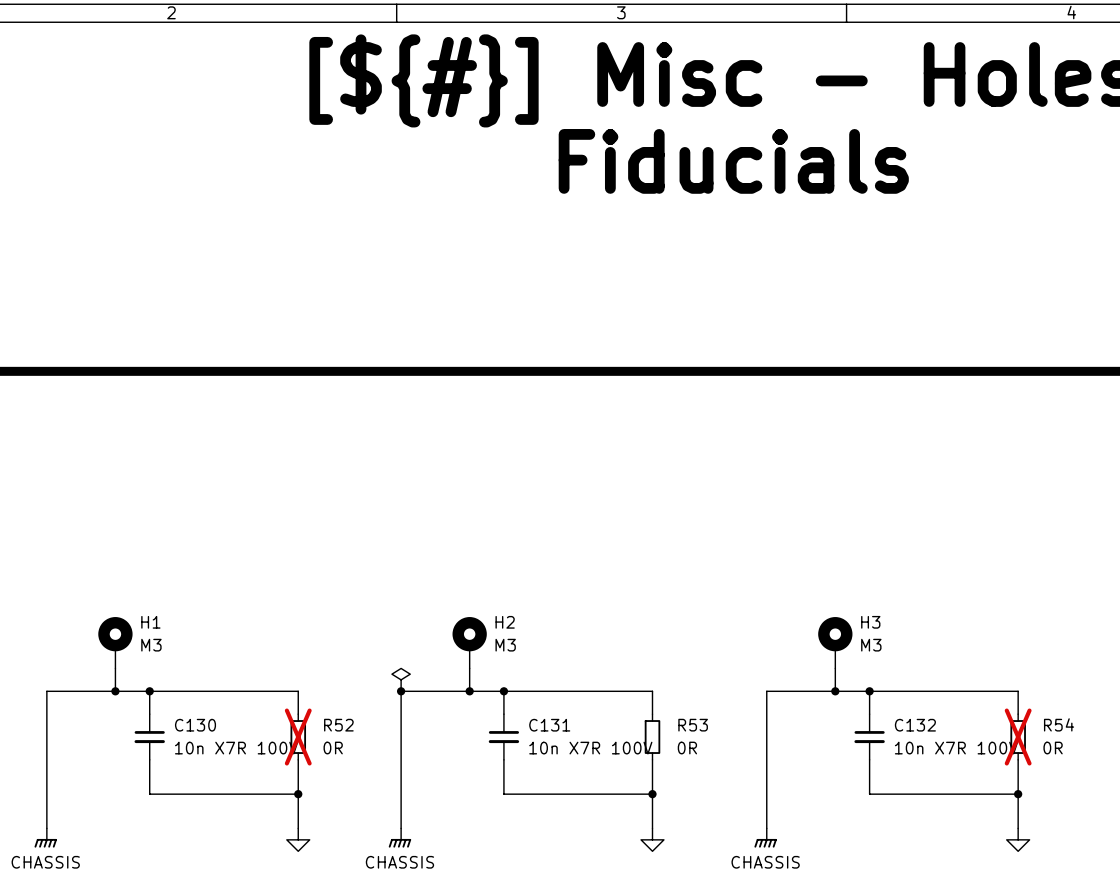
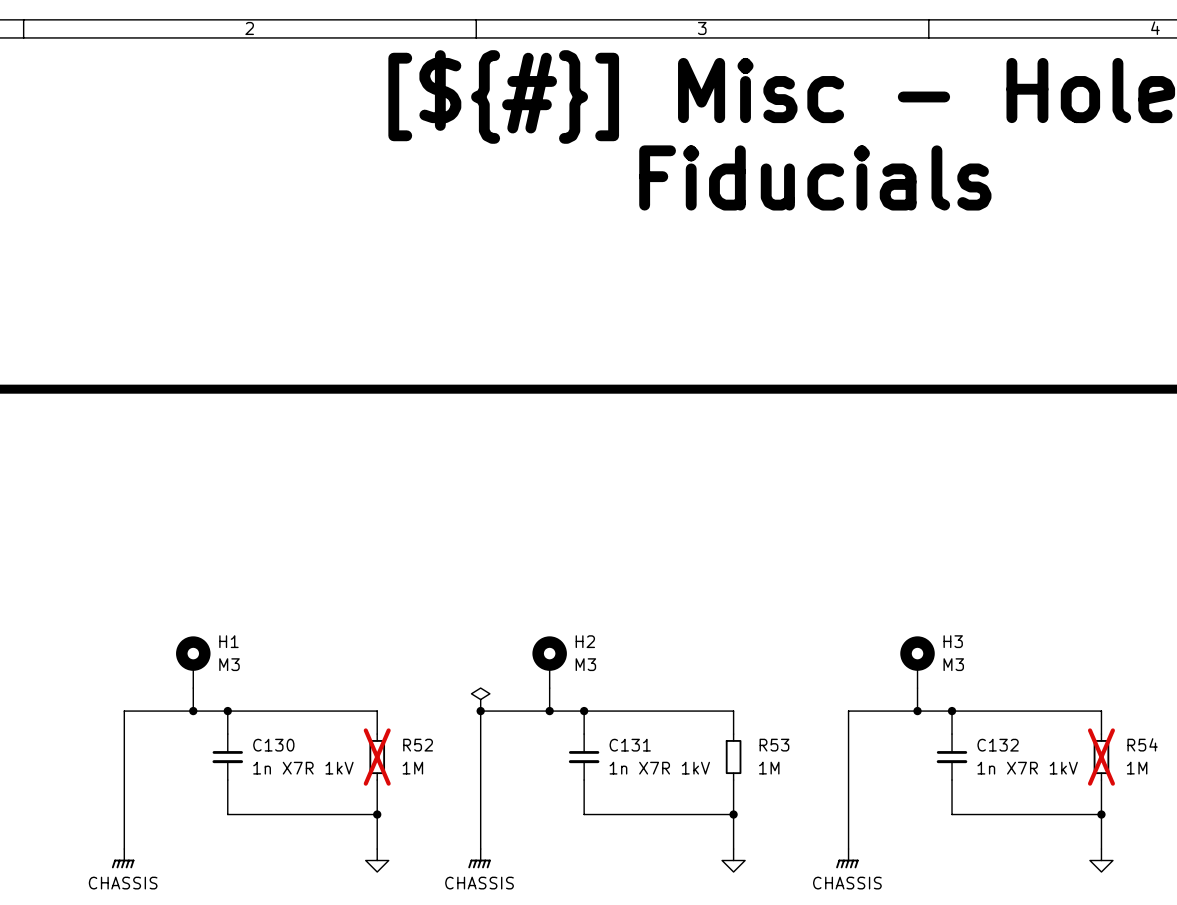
C130 value: 10n X7R 100V (236, 748) -> 1n X7R 1kV (303, 768)
R52 value: 0R (333, 748) -> 1M (412, 768)
C131 value: 10n X7R 100V (590, 748) -> 1n X7R 1kV (659, 768)
R53 value: 0R (687, 748) -> 1M (769, 768)
C132 value: 10n X7R 100V (956, 748) -> 1n X7R 1kV (1027, 768)
R54 value: 0R (1053, 748) -> 1M (1137, 768)

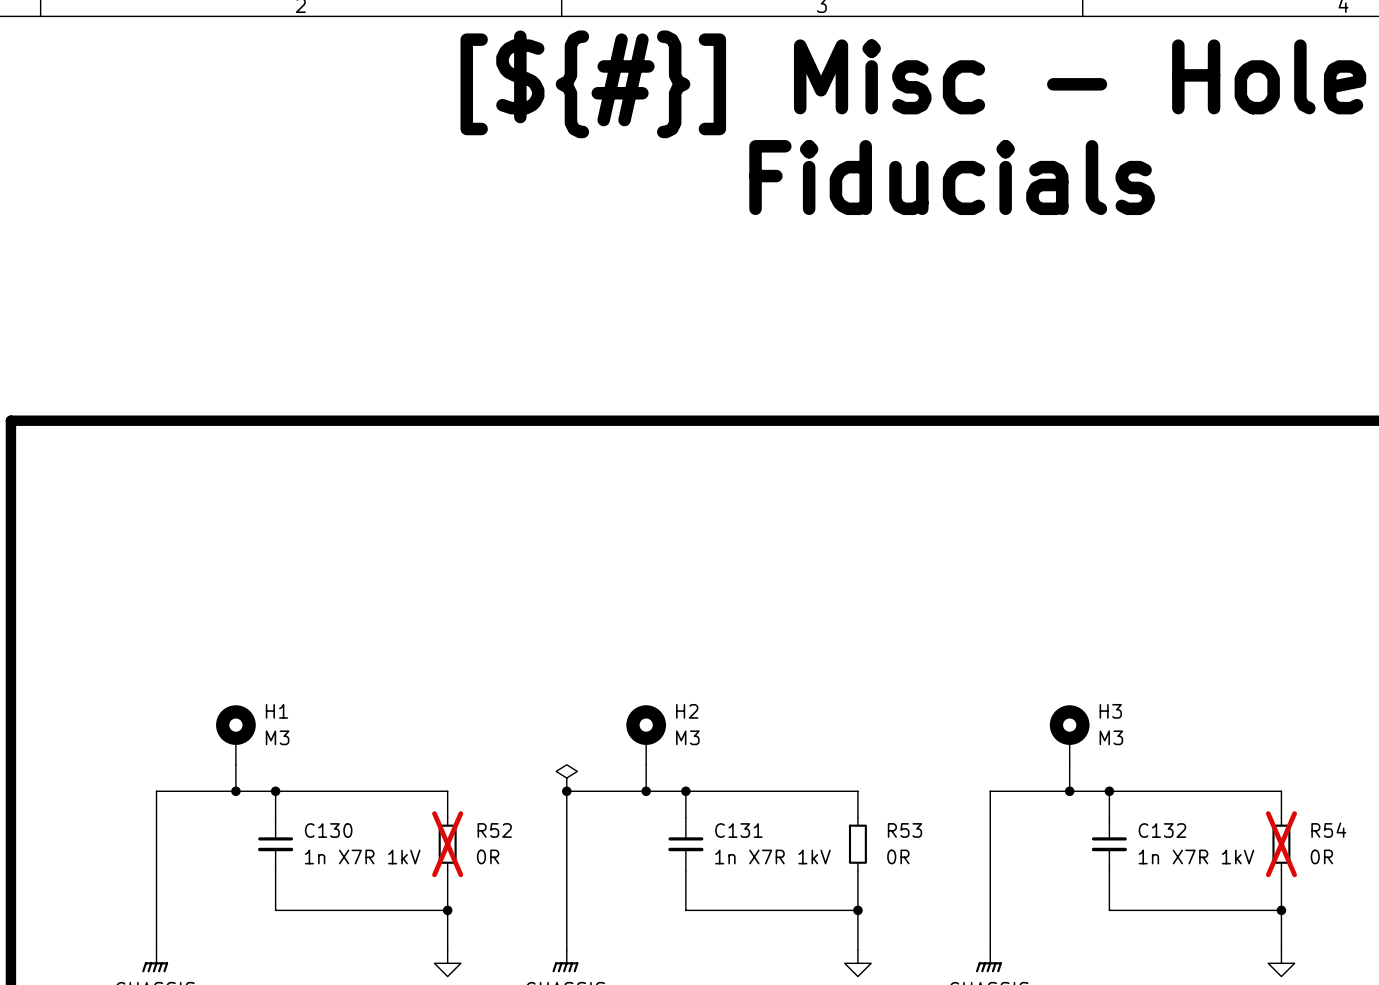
R52 value: 1M (412, 768) -> 0R (488, 856)
R53 value: 1M (769, 768) -> 0R (898, 856)
R54 value: 1M (1137, 768) -> 0R (1321, 856)

